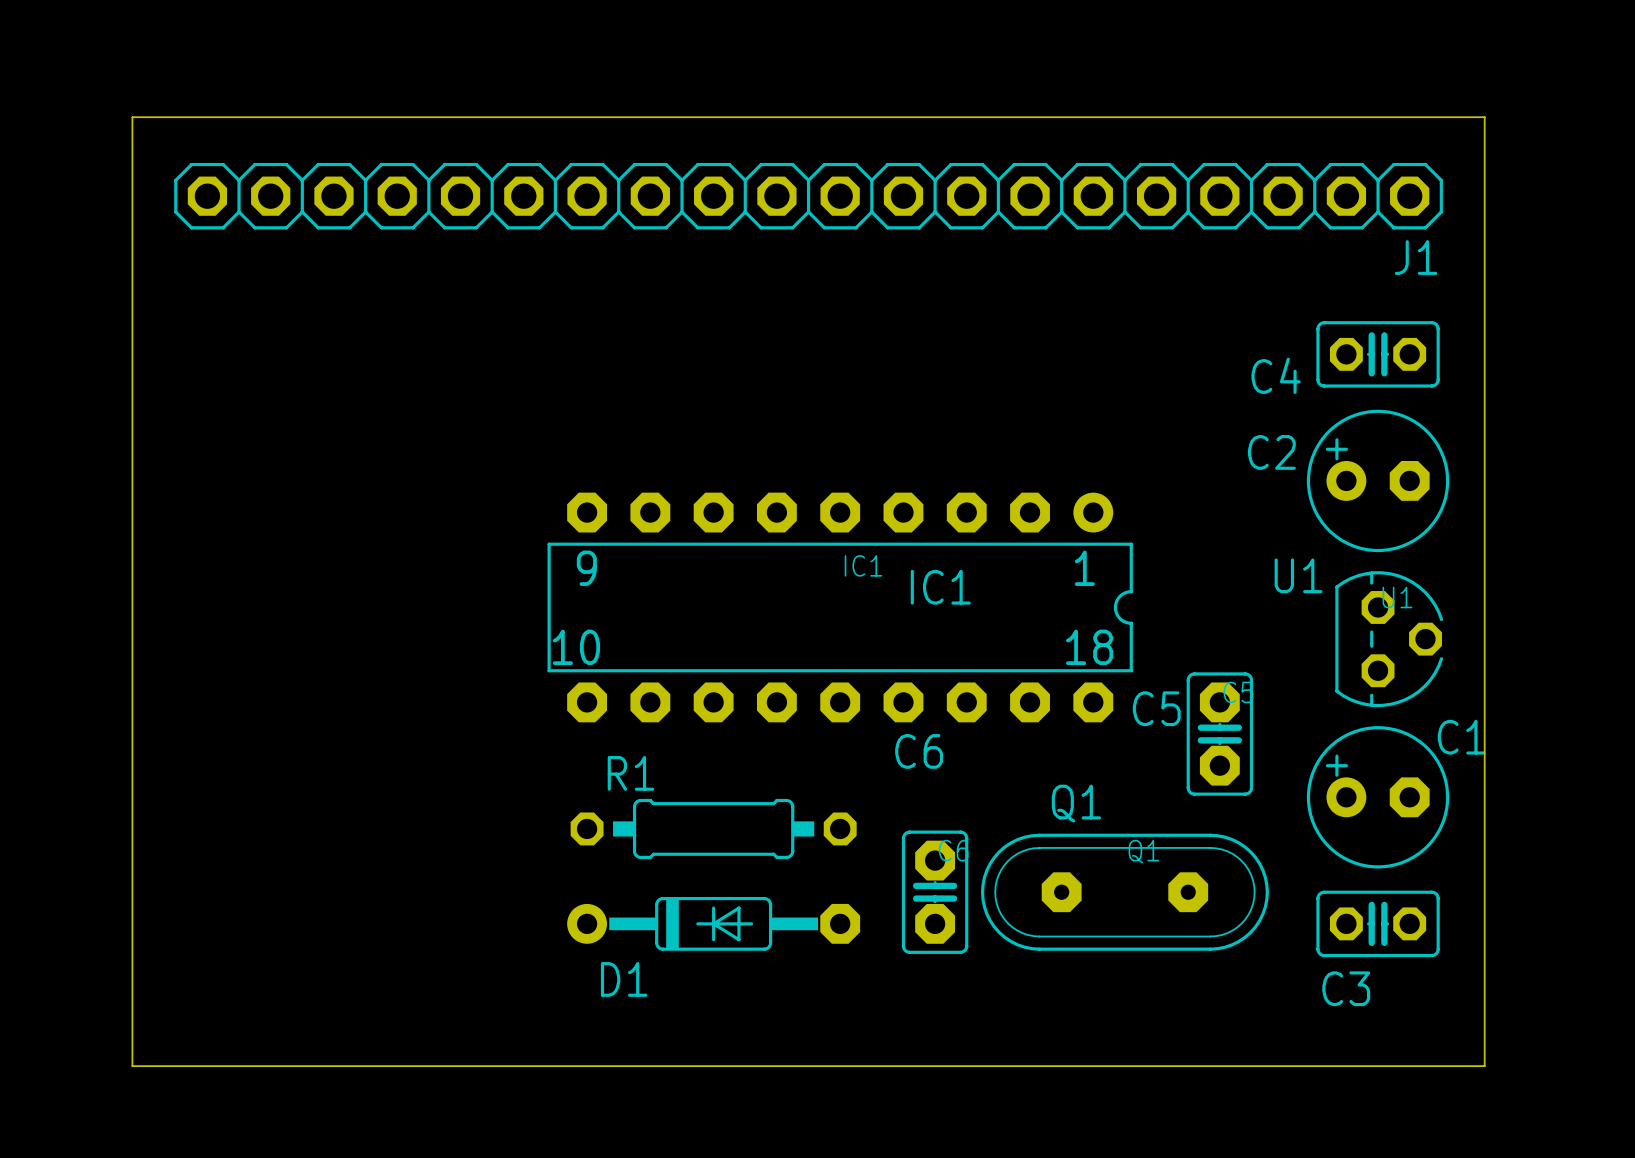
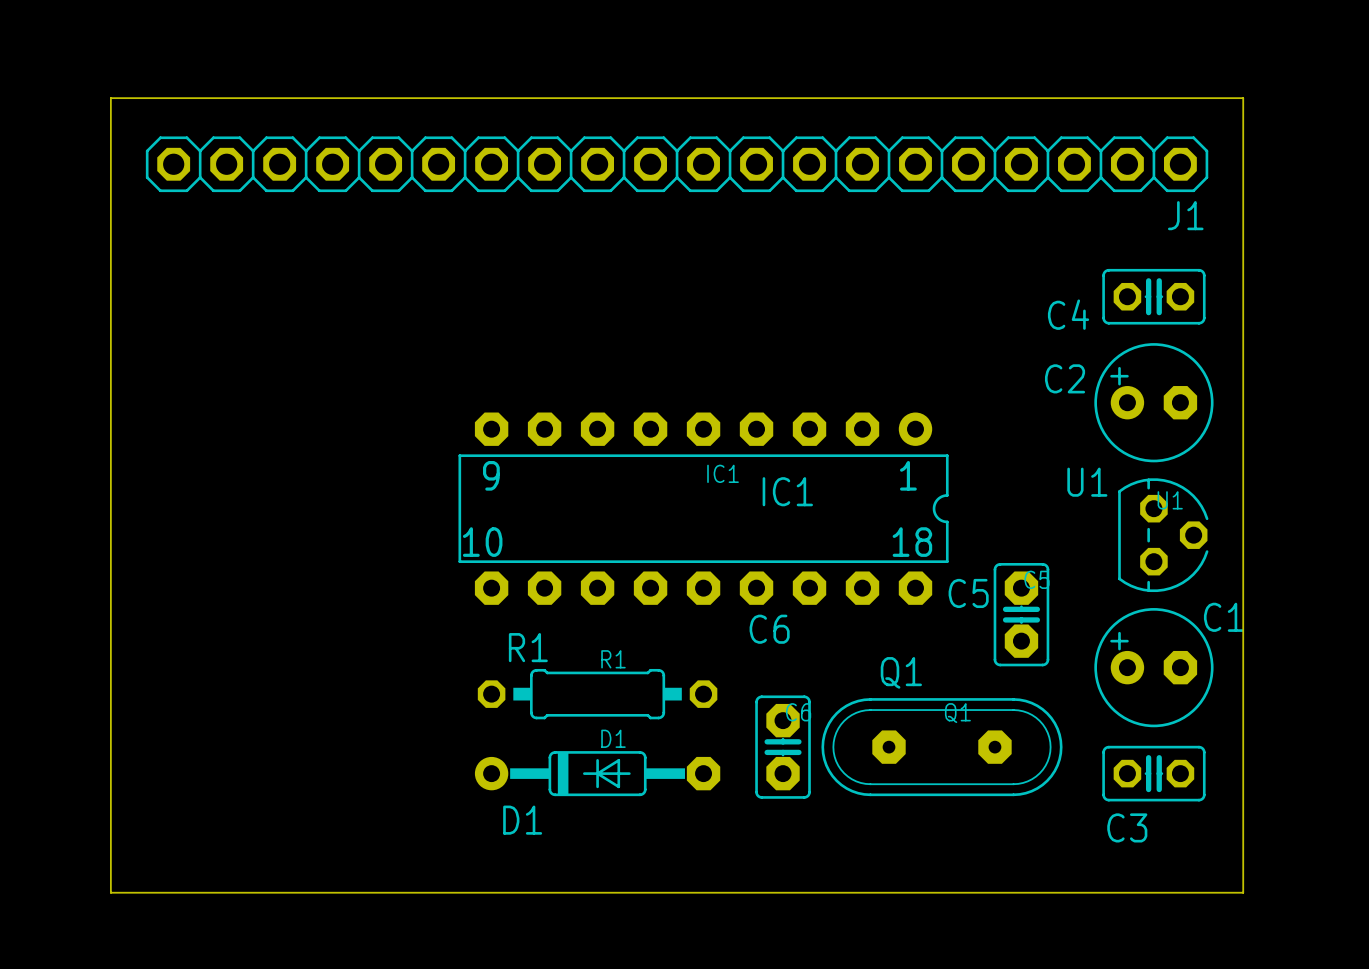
text: none -> R1 (613, 659)
text: none -> D1 (613, 738)

